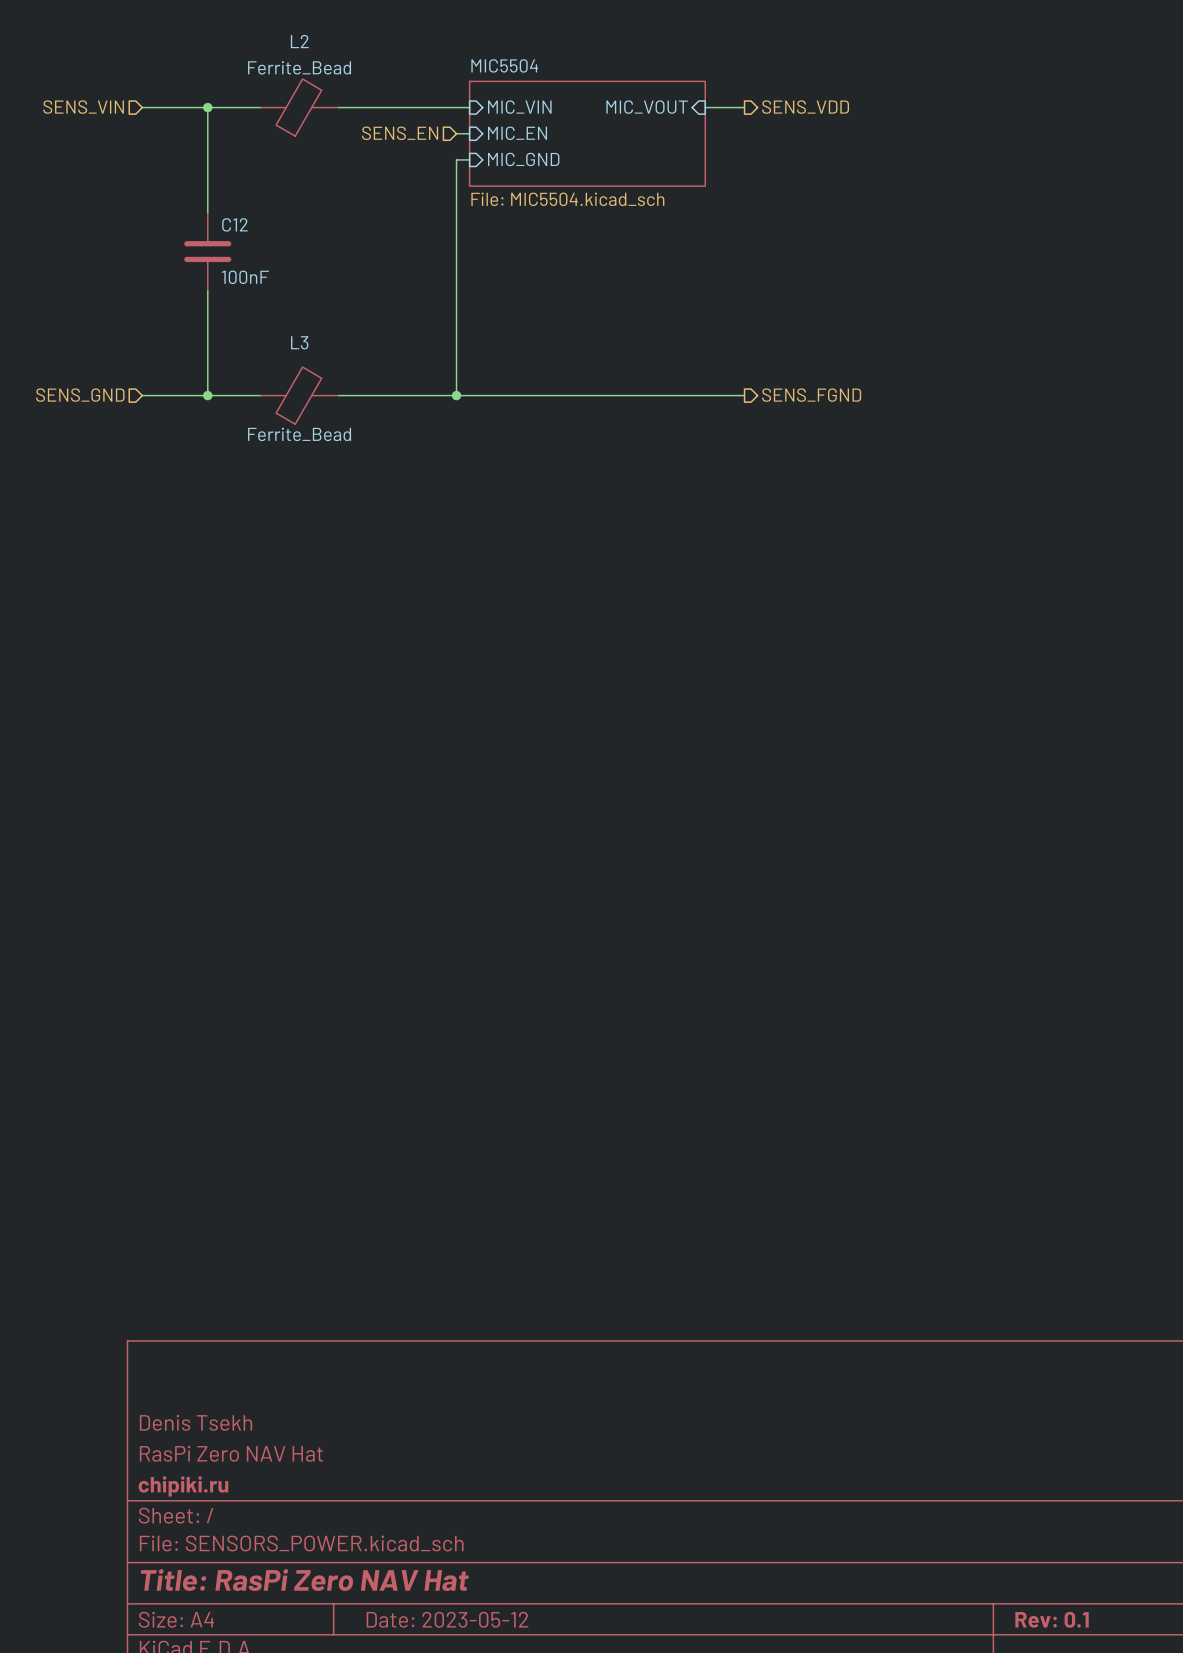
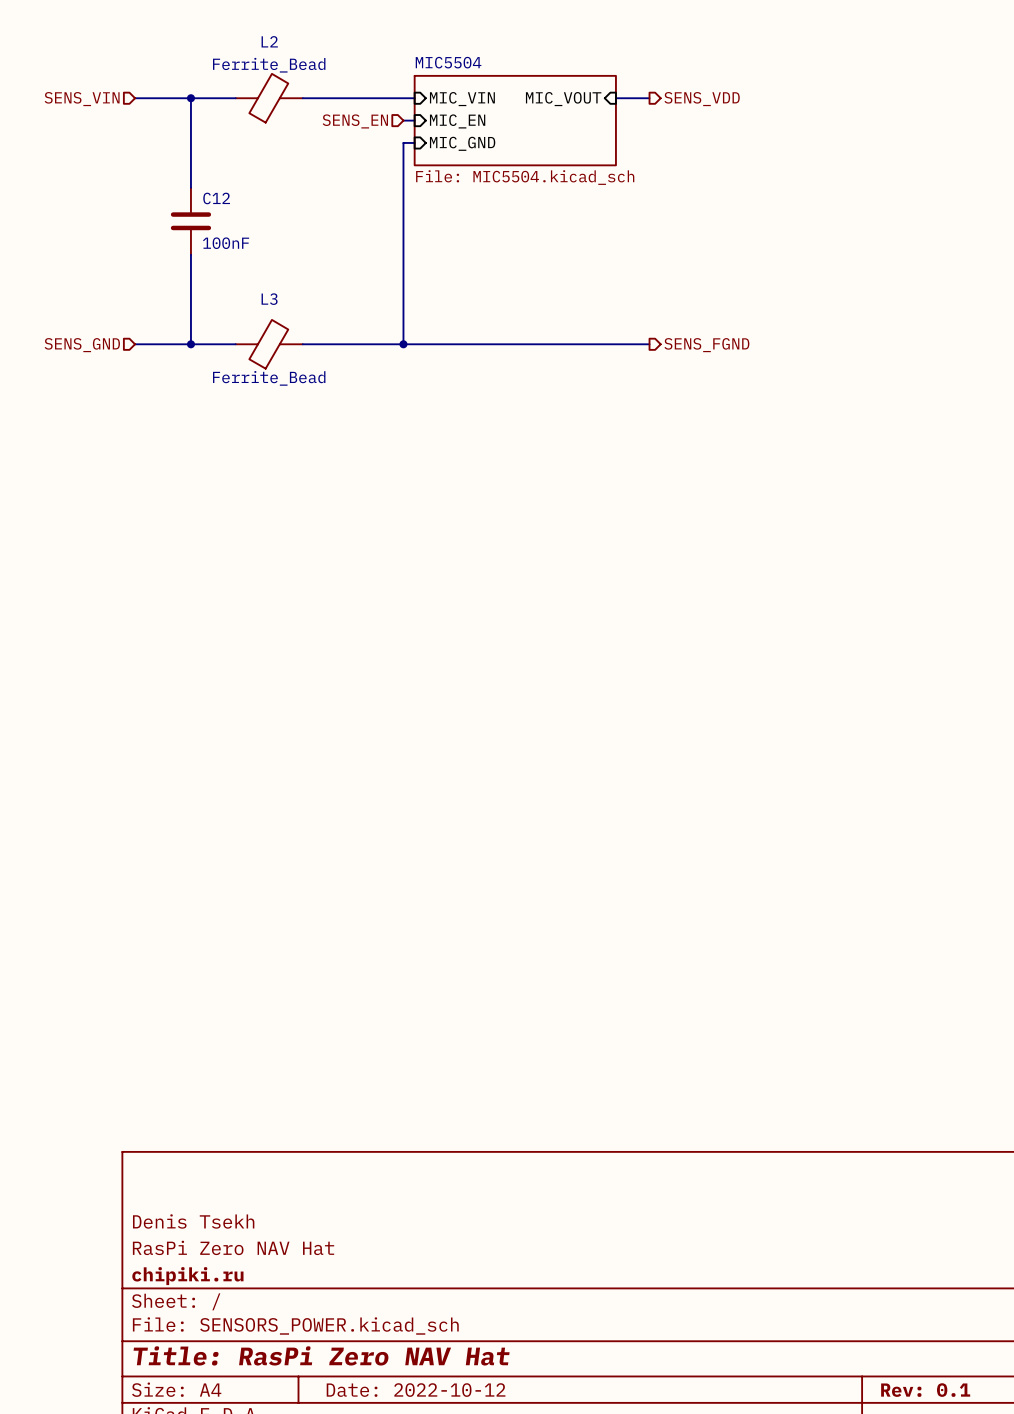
title block: Date: 2023-05-12 (447, 1619) -> Date: 2022-10-12 (416, 1390)

